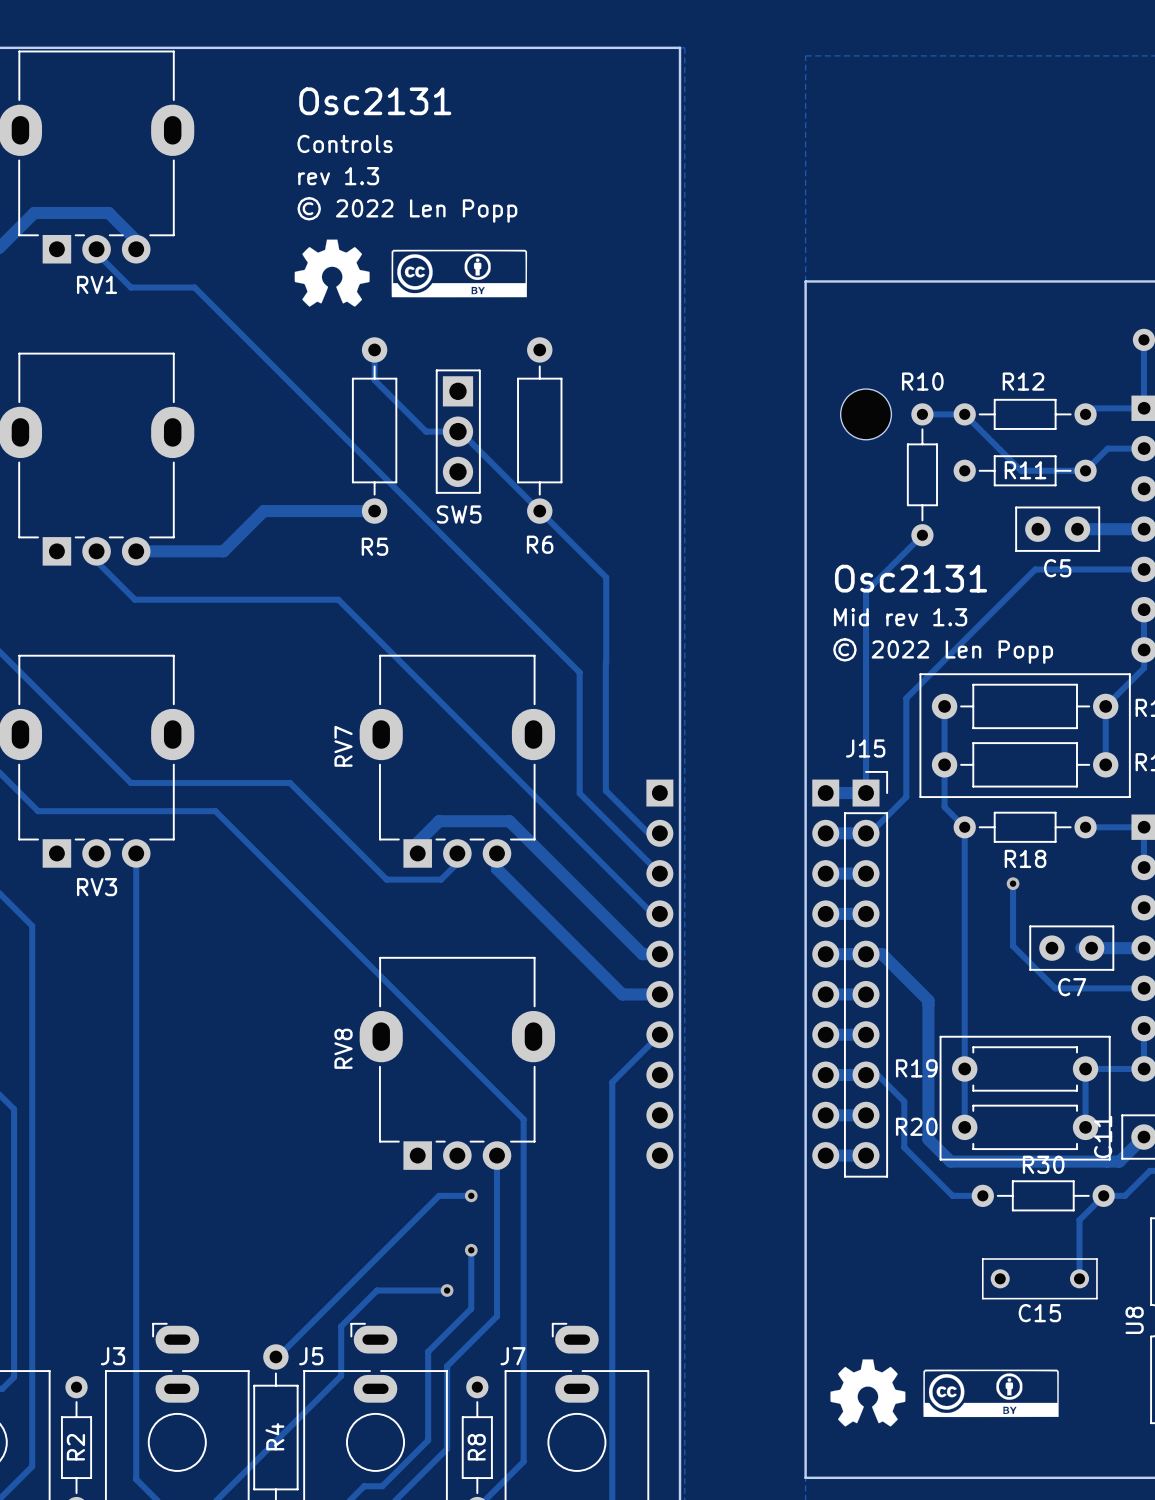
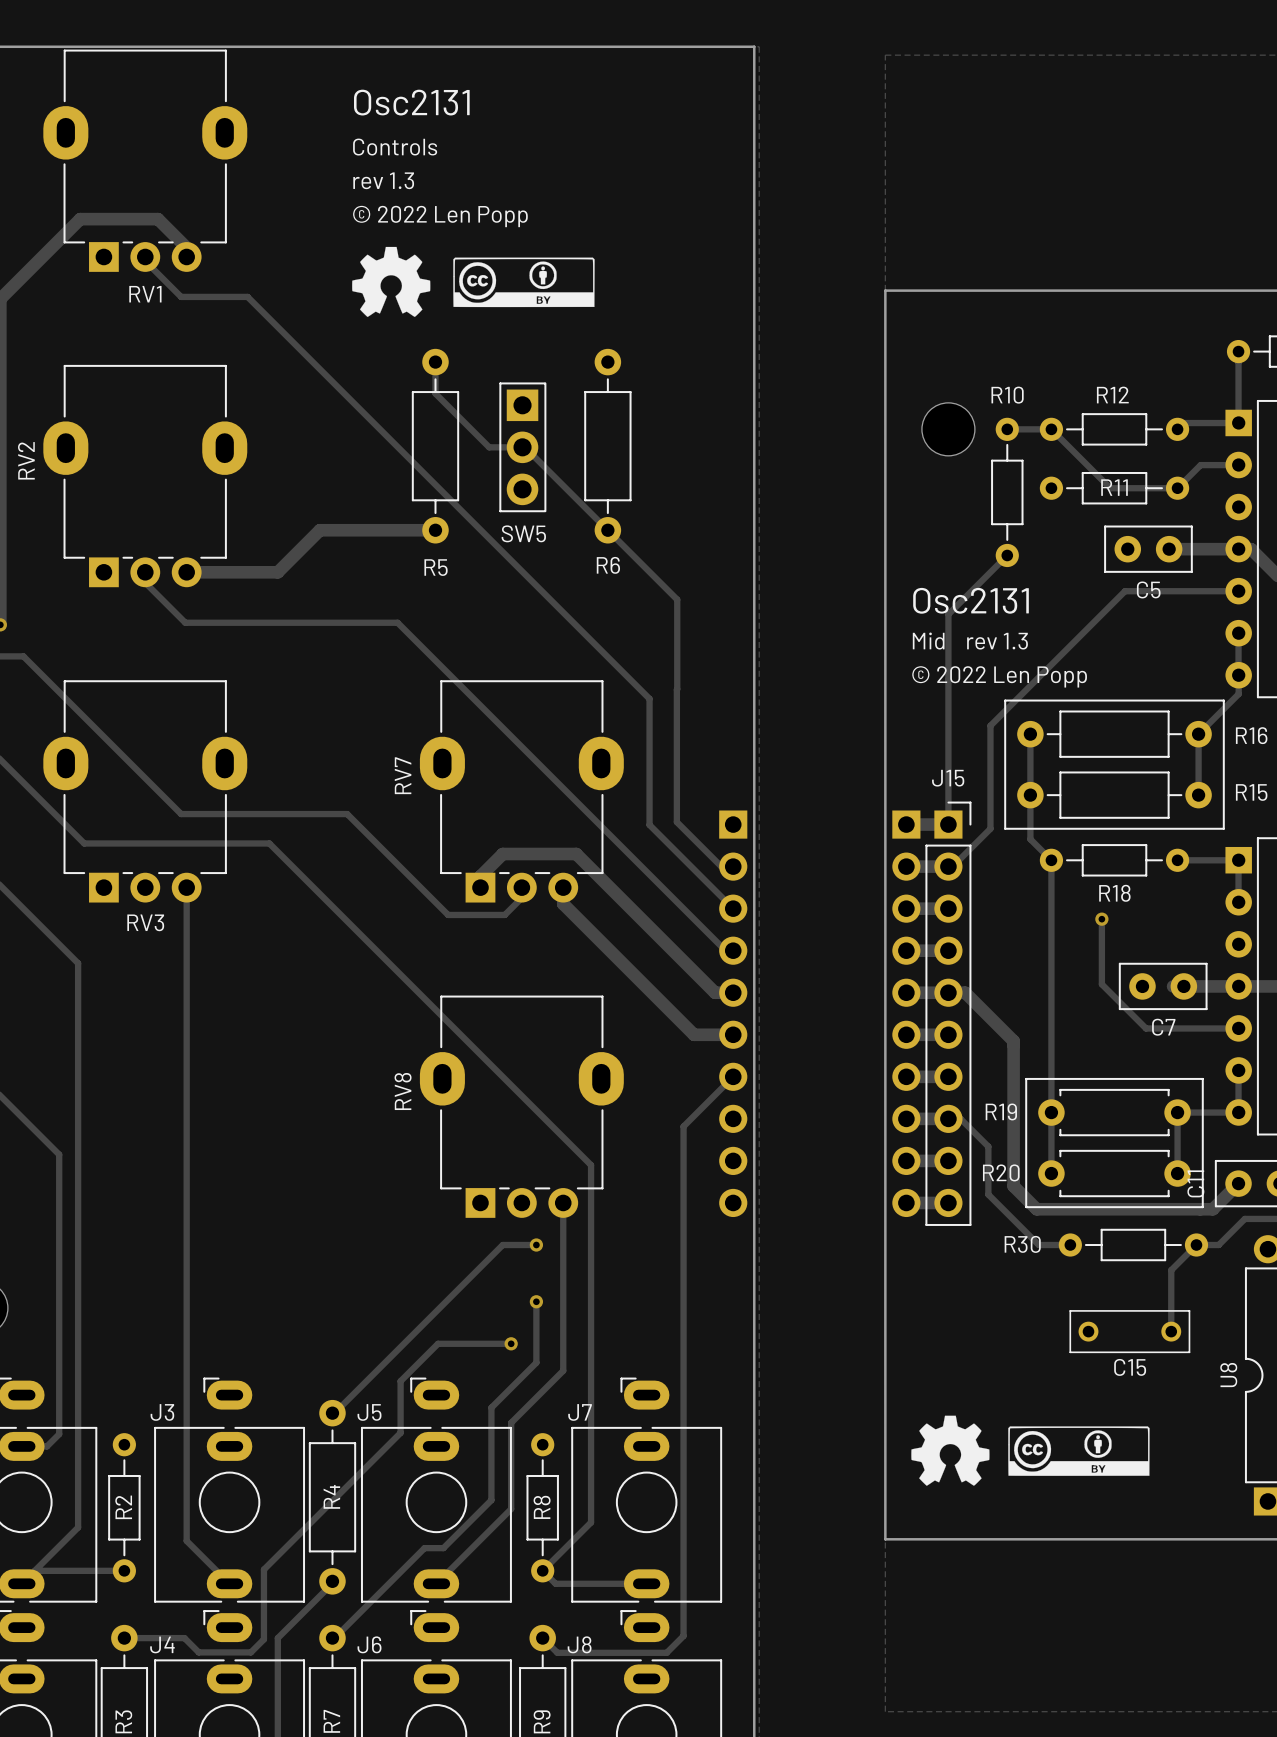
R30 name position: R30 (1043, 1164) -> R30 (1022, 1244)

